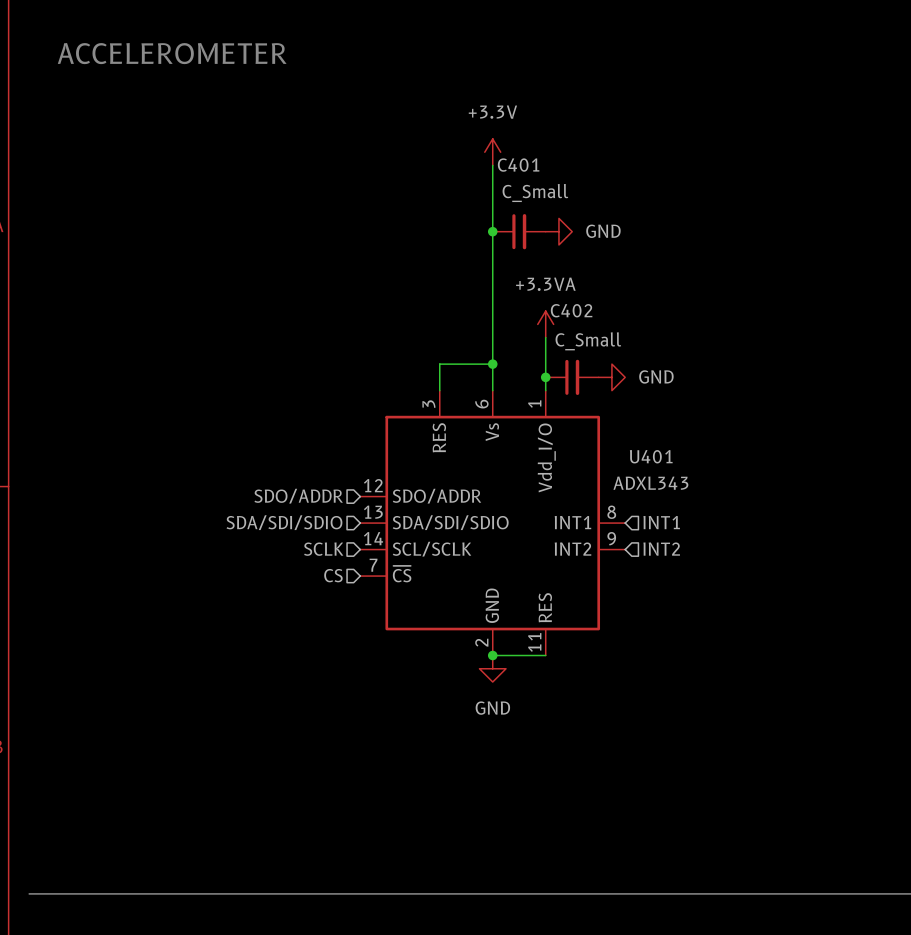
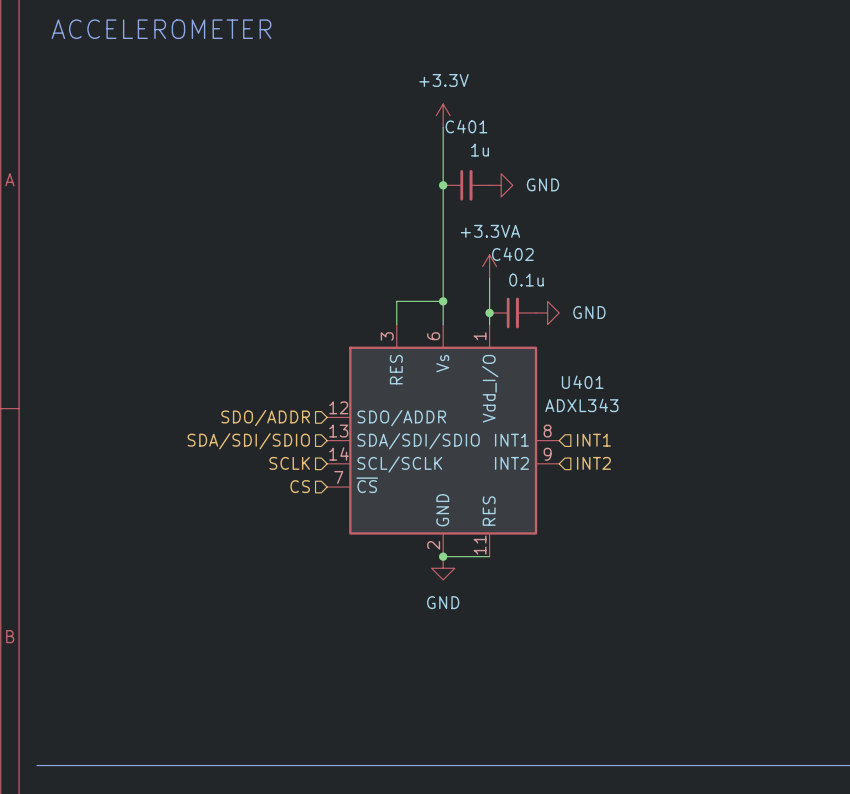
C401 value: C_Small (535, 193) -> 1u (480, 150)
C402 value: C_Small (588, 341) -> 0.1u (526, 280)

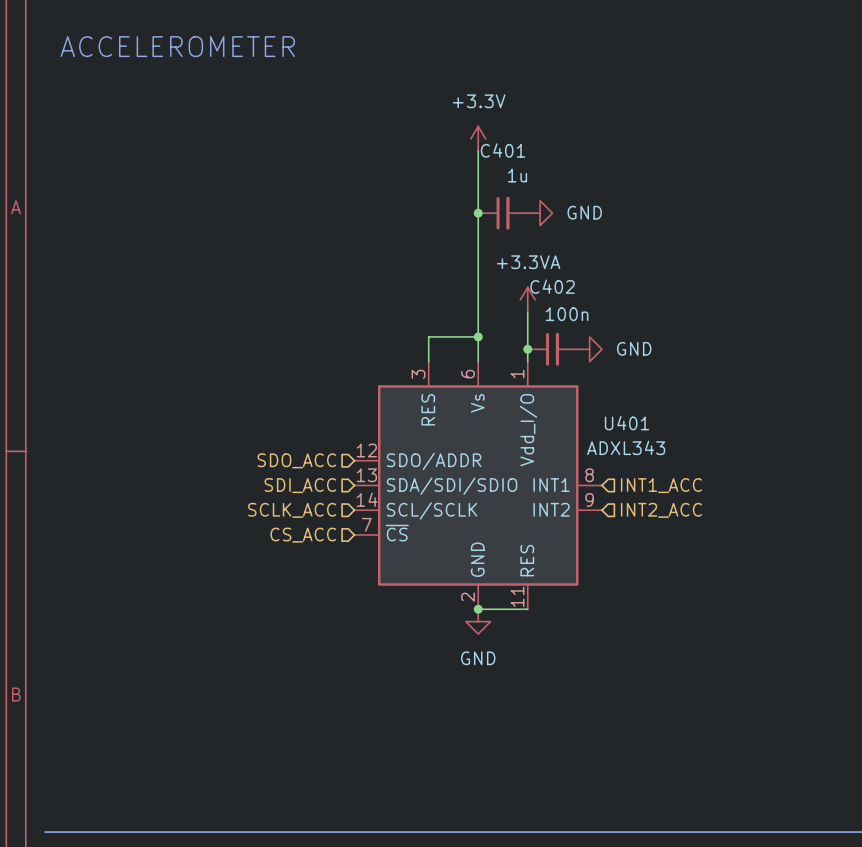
C402 value: 0.1u (526, 280) -> 100n (567, 314)
hierarchical label: SDO/ADDR (265, 418) -> SDO_ACC (296, 460)
hierarchical label: INT1 (593, 440) -> INT1_ACC (661, 485)
hierarchical label: SDA/SDI/SDIO (248, 441) -> SDI_ACC (300, 485)
hierarchical label: SCLK (289, 463) -> SCLK_ACC (292, 510)
hierarchical label: INT2 (593, 463) -> INT2_ACC (661, 510)
hierarchical label: CS (300, 486) -> CS_ACC (303, 535)

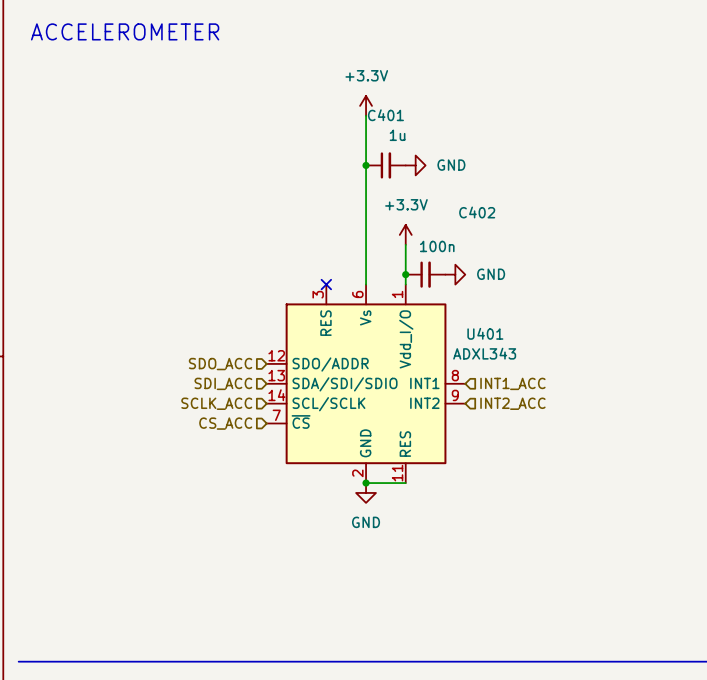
C402 name position: C402 (552, 286) -> C402 (477, 212)
power symbol: +3.3VA (527, 299) -> +3.3V (405, 234)
wire: (478, 336) (428, 336) (428, 361) -> none
junction: (478, 336) -> none
no-connect mark: none -> (326, 284)

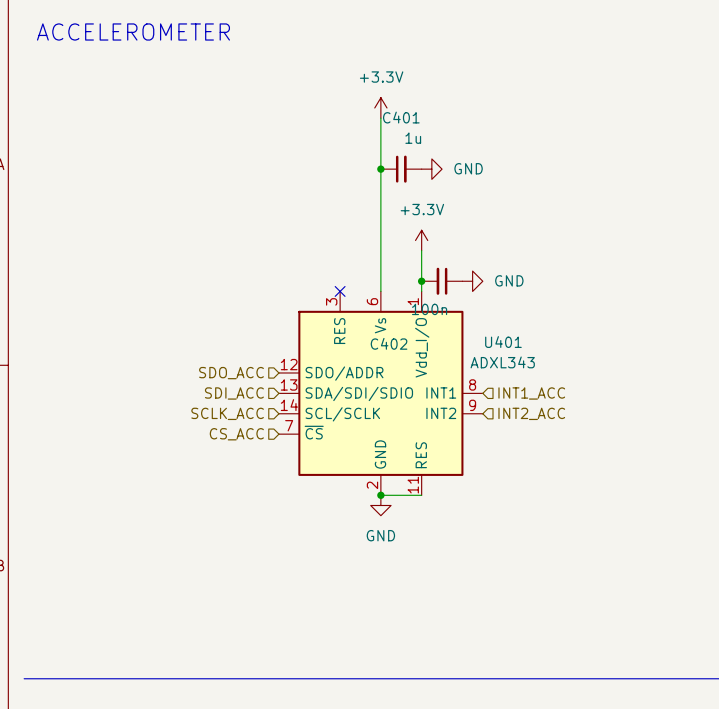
C402 rotation: 0° (425, 274) -> 180° (441, 281)

